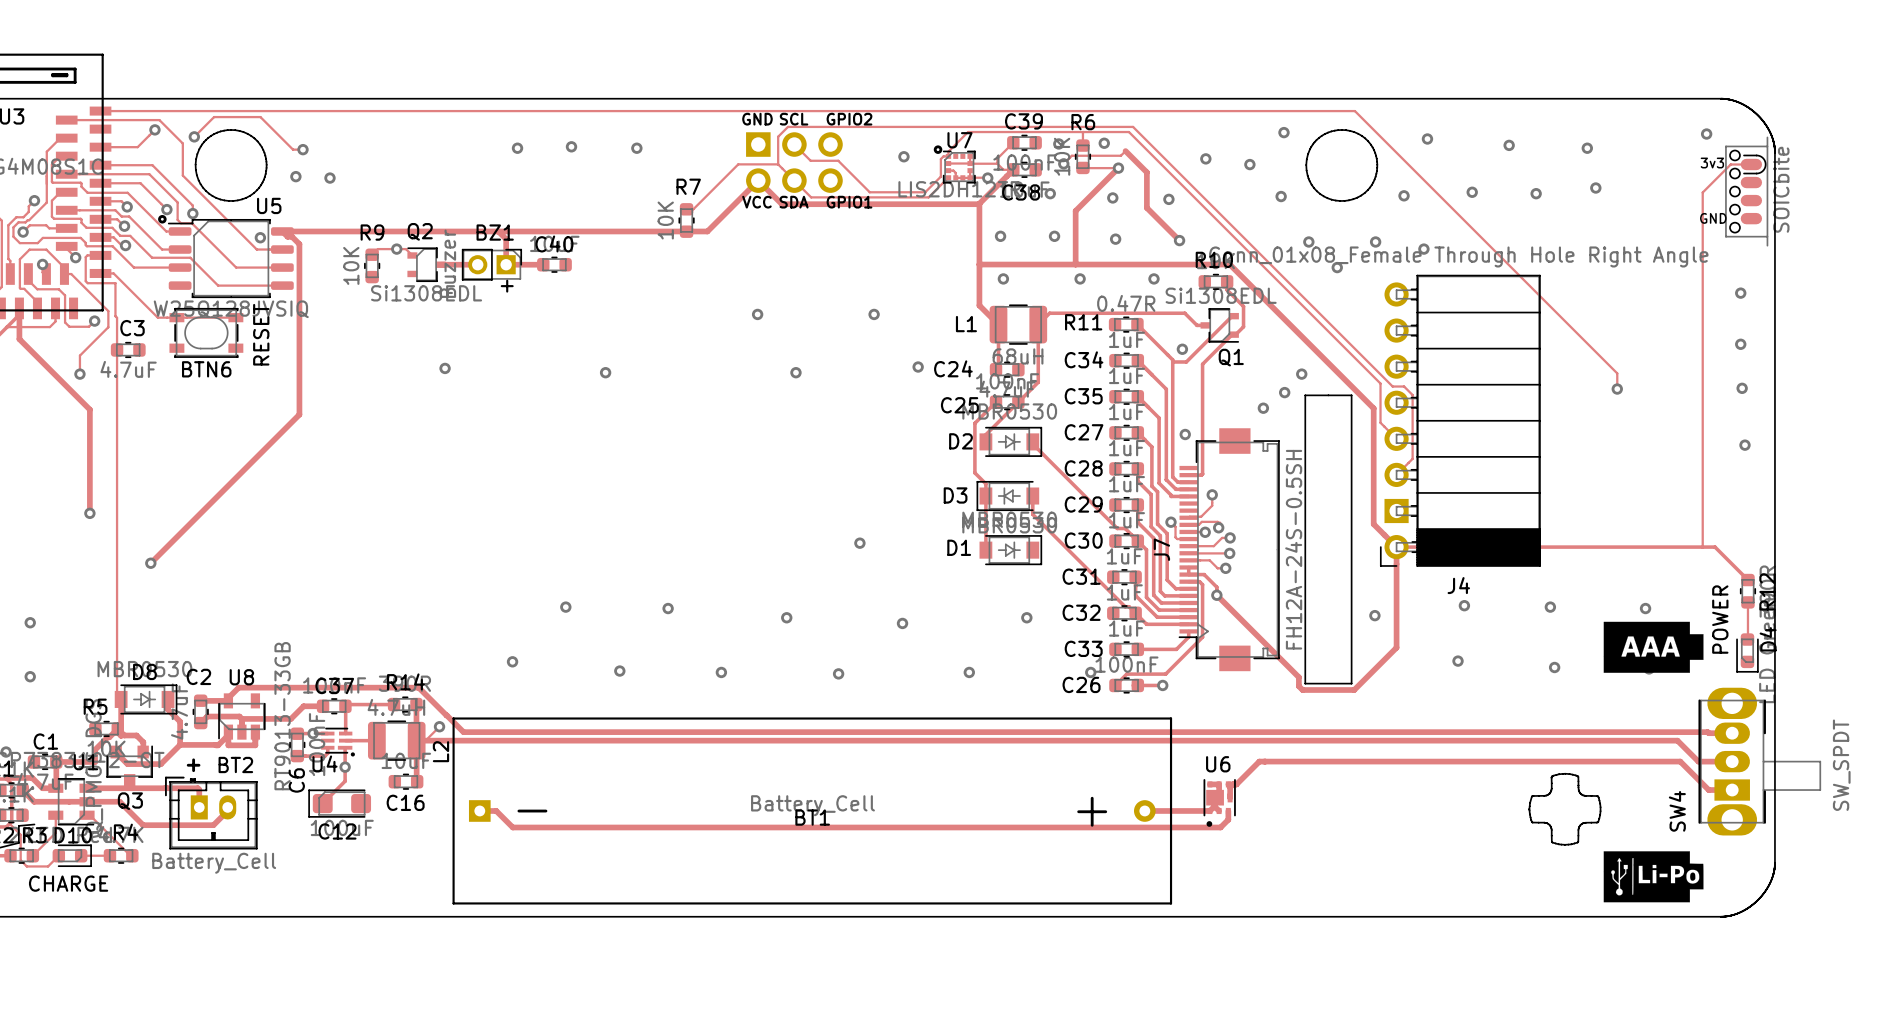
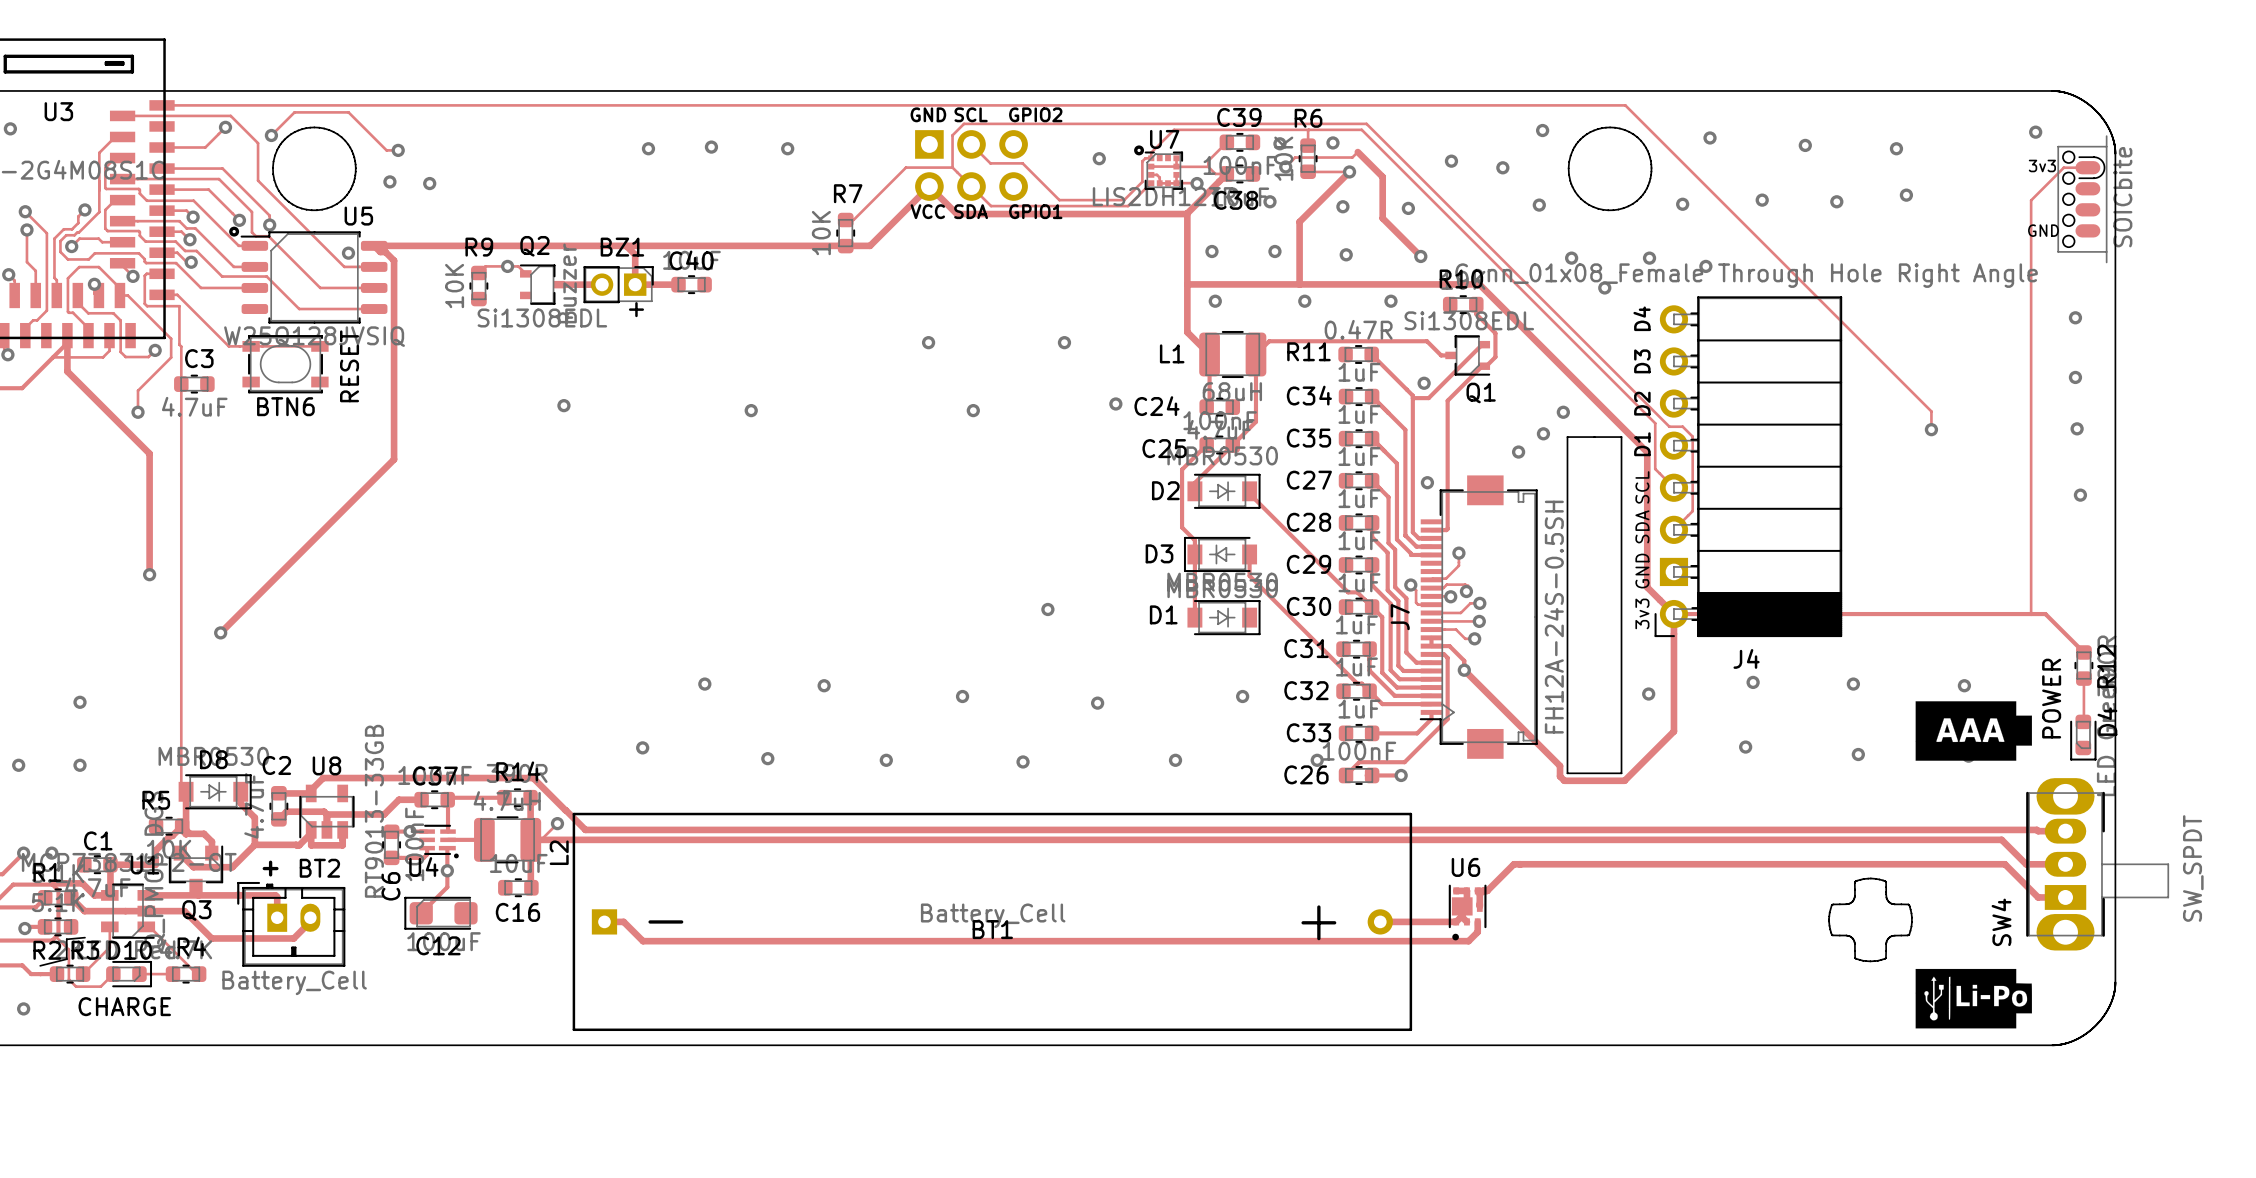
text: none -> D4 (1642, 318)
text: none -> D3 (1642, 361)
text: none -> D2 (1642, 403)
text: none -> D1 (1642, 444)
text: none -> SCL (1642, 487)
text: none -> SDA (1642, 526)
text: none -> GND (1642, 571)
text: none -> 3v3 (1642, 613)

